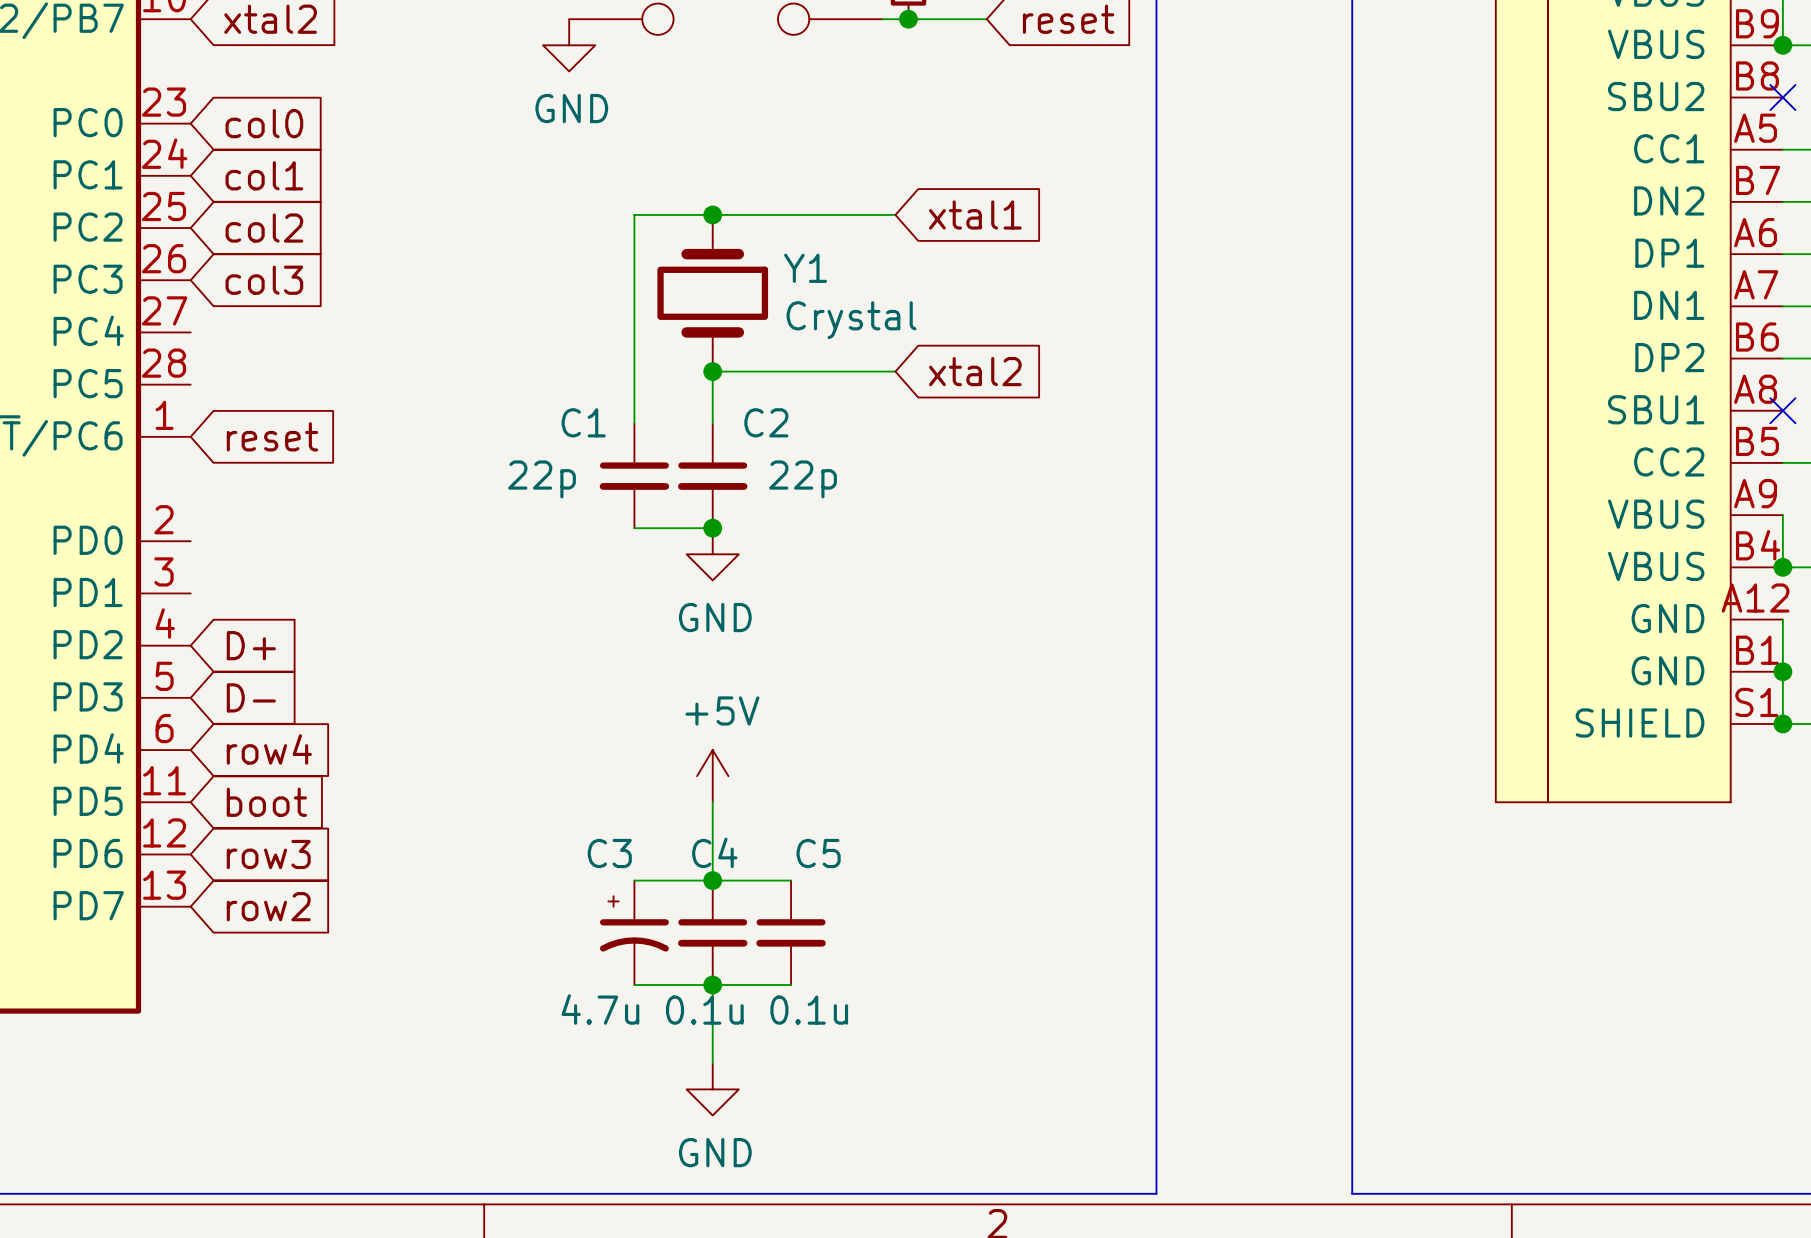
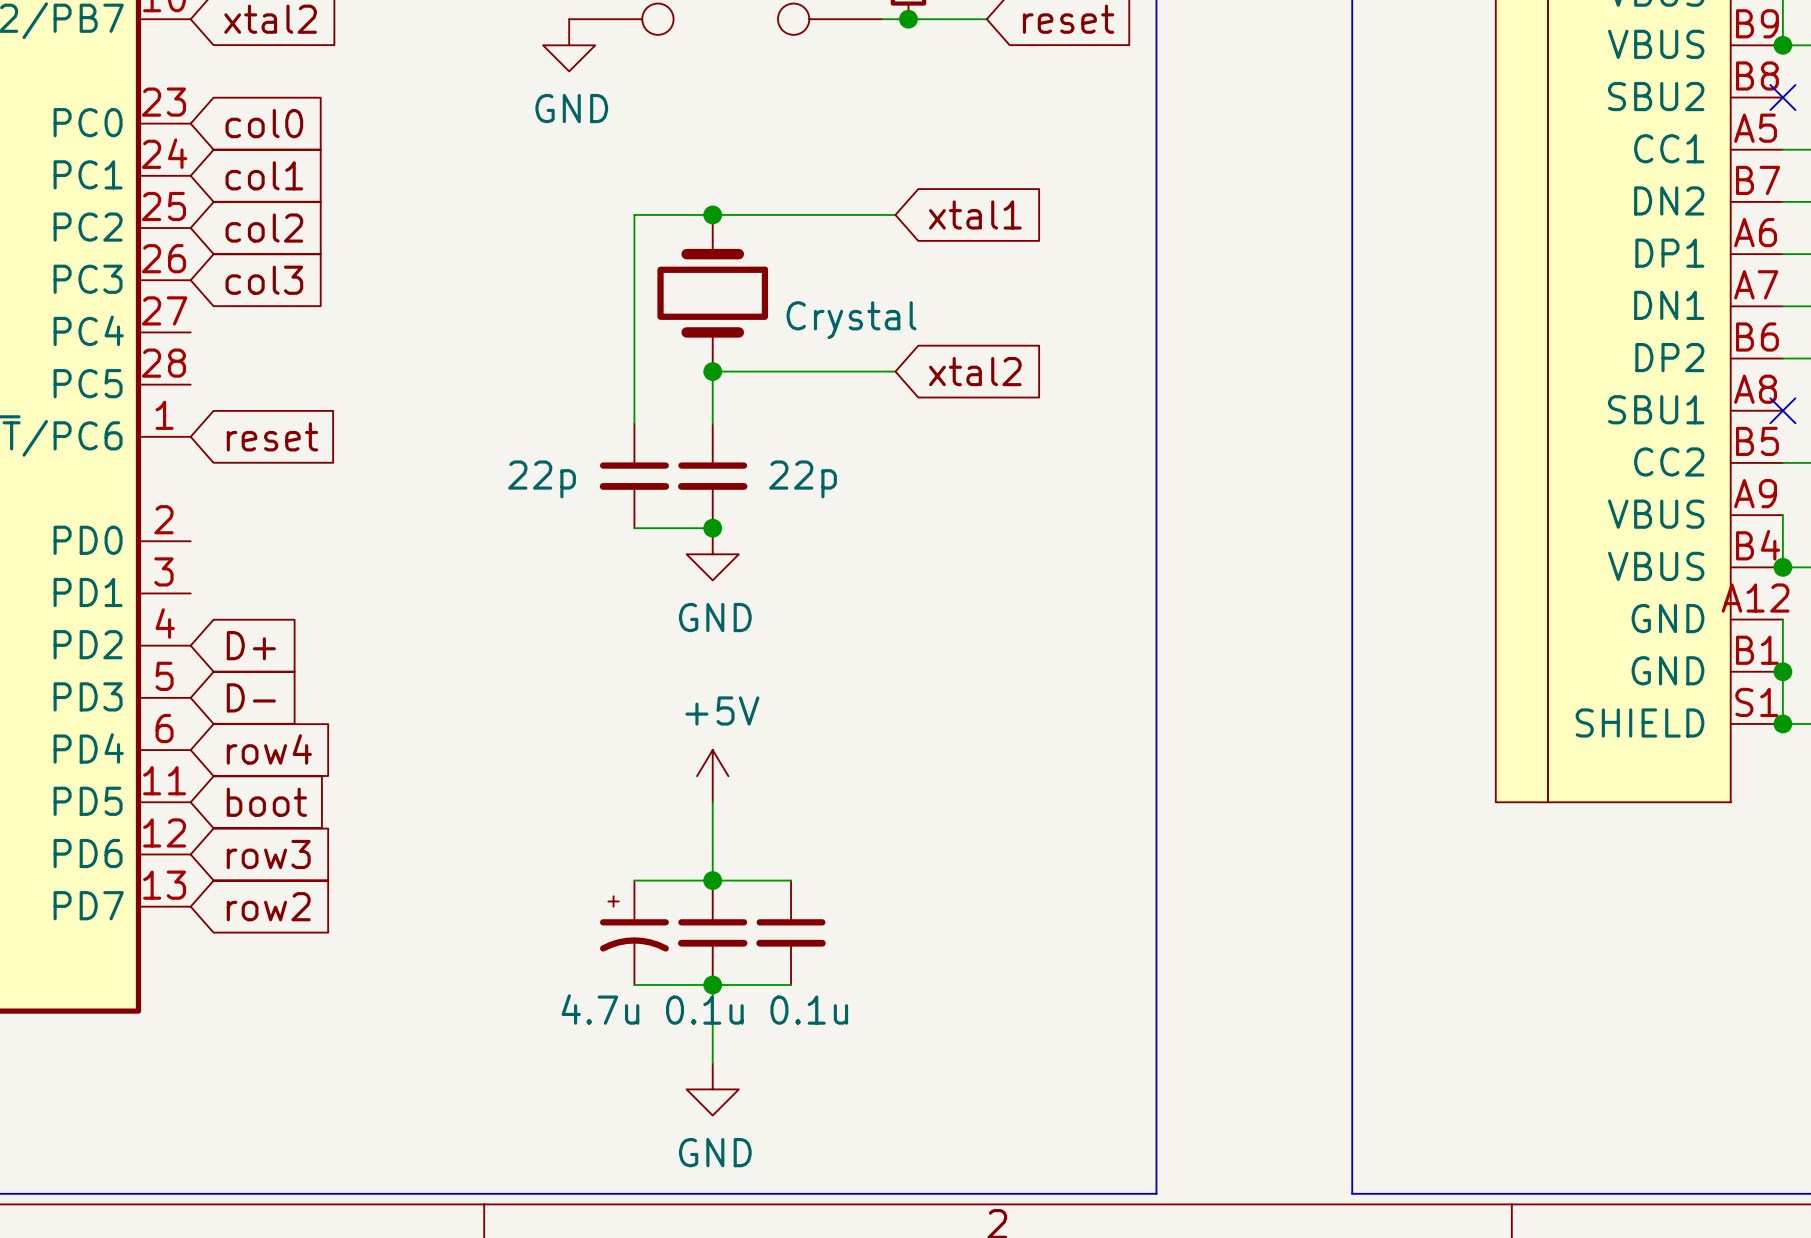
Y1 name: Y1 (805, 268) -> none
C1 name: C1 (583, 422) -> none
C2 name: C2 (766, 422) -> none
C4 name: C4 (714, 852) -> none
C3 name: C3 (609, 853) -> none
C5 name: C5 (818, 853) -> none

